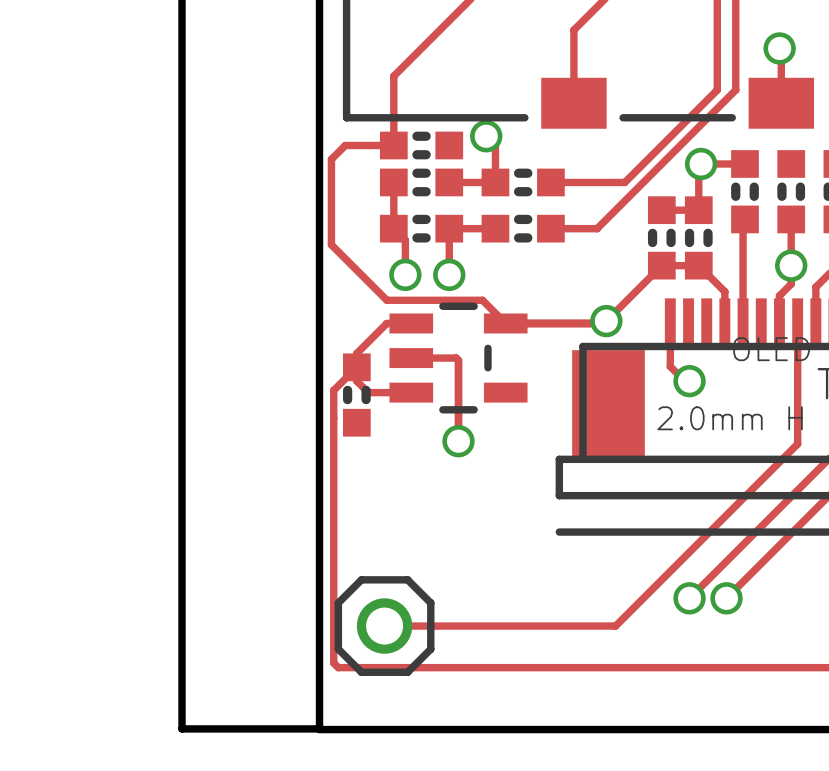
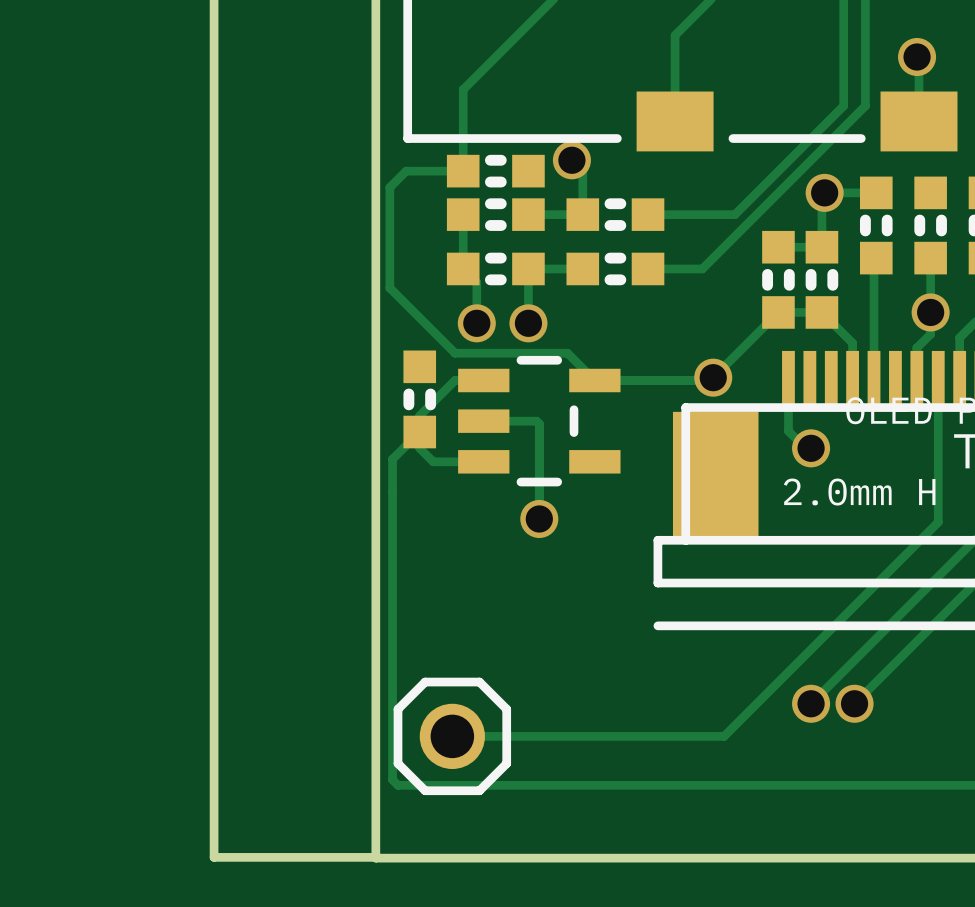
part position: (356, 395) -> (419, 399)

